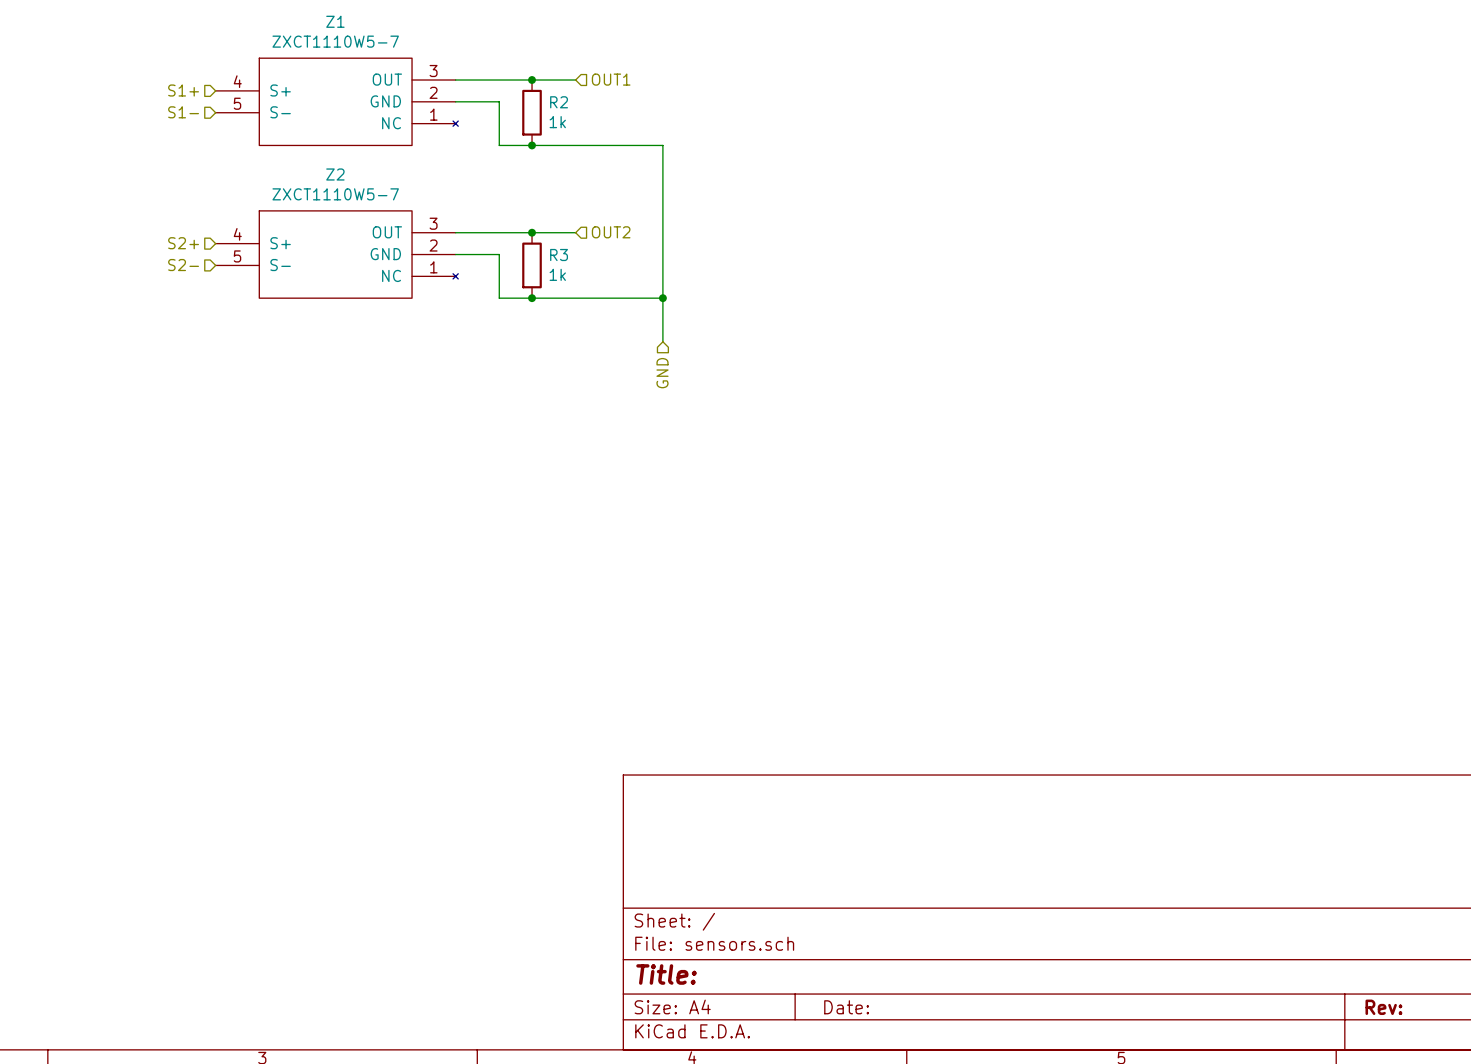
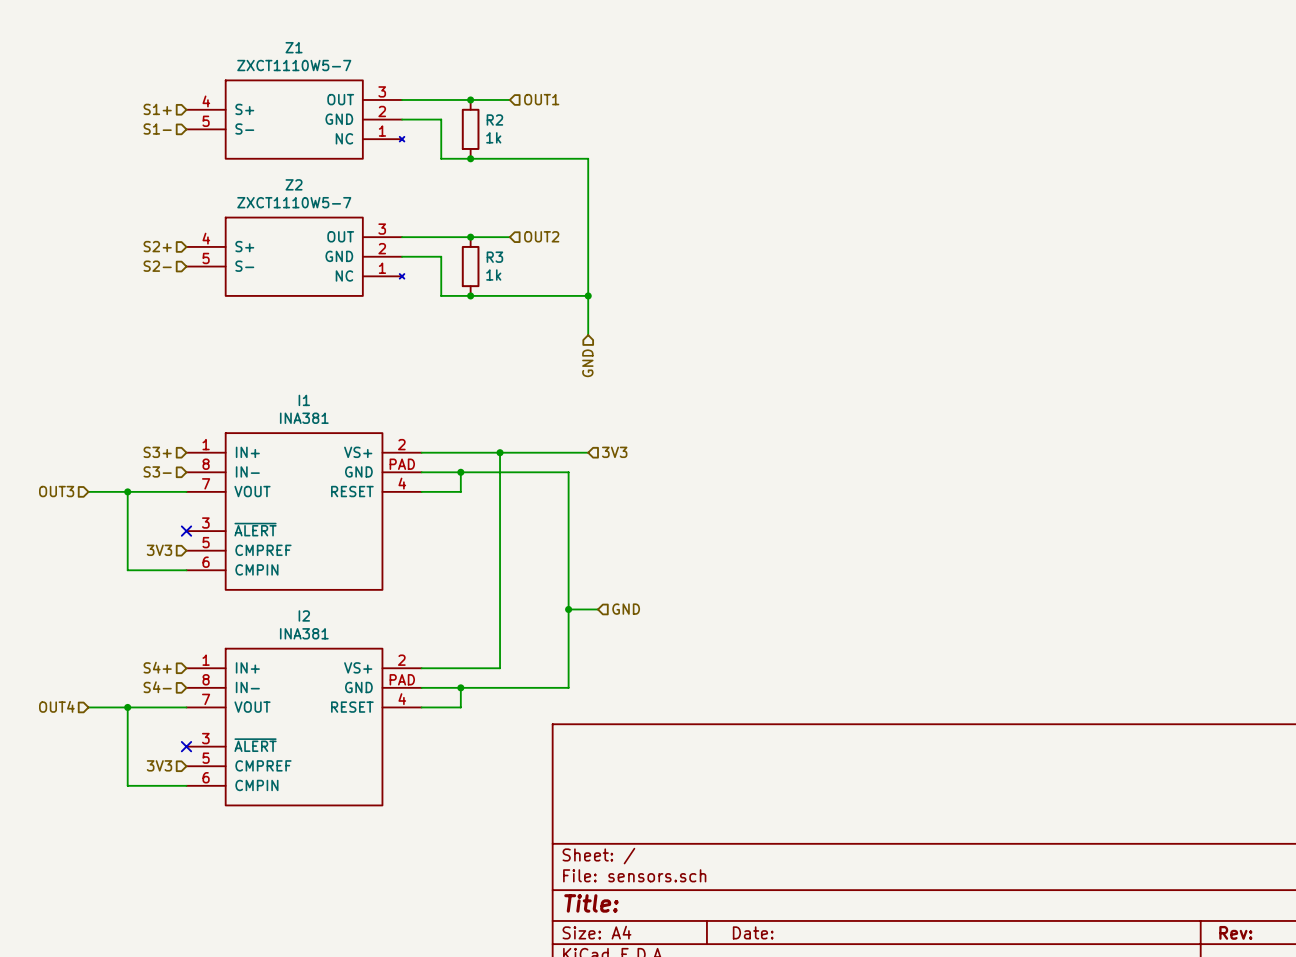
hierarchical label: none -> S3+ (157, 452)
wire: none -> (421, 452) (588, 452)
wire: none -> (500, 452) (500, 668) (421, 668)
junction: none -> (500, 452)
hierarchical label: none -> 3V3 (614, 452)
hierarchical label: none -> S3- (157, 471)
wire: none -> (421, 472) (568, 472) (568, 687) (421, 687)
wire: none -> (460, 472) (460, 491) (421, 491)
junction: none -> (460, 472)
hierarchical label: none -> OUT3 (56, 491)
wire: none -> (88, 491) (186, 491)
wire: none -> (127, 491) (127, 570) (186, 570)
junction: none -> (127, 491)
I1: none -> INA381 (304, 511)
no-connect mark: none -> (186, 531)
hierarchical label: none -> 3V3 (159, 550)
hierarchical label: none -> GND (626, 609)
wire: none -> (568, 609) (598, 609)
junction: none -> (568, 609)
hierarchical label: none -> S4+ (157, 667)
hierarchical label: none -> S4- (157, 687)
wire: none -> (460, 687) (460, 707) (421, 707)
junction: none -> (460, 687)
hierarchical label: none -> OUT4 (56, 706)
wire: none -> (88, 707) (186, 707)
wire: none -> (127, 707) (127, 785) (186, 785)
junction: none -> (127, 707)
I2: none -> INA381 (304, 727)
no-connect mark: none -> (186, 746)
hierarchical label: none -> 3V3 (159, 765)

